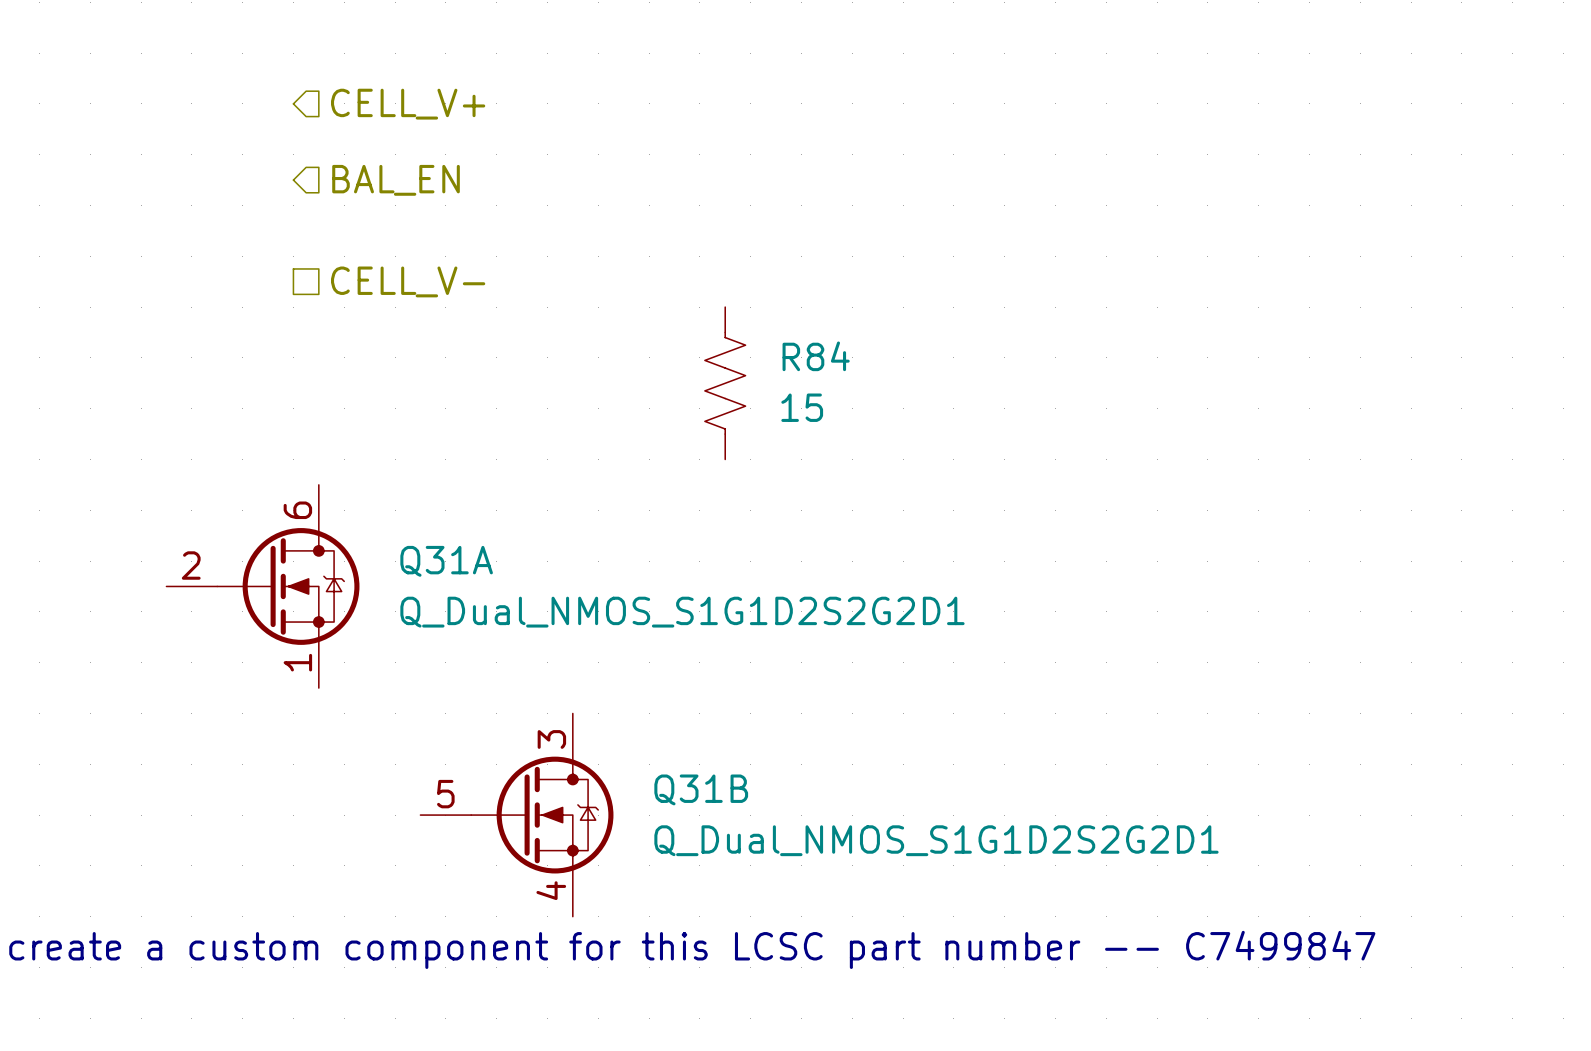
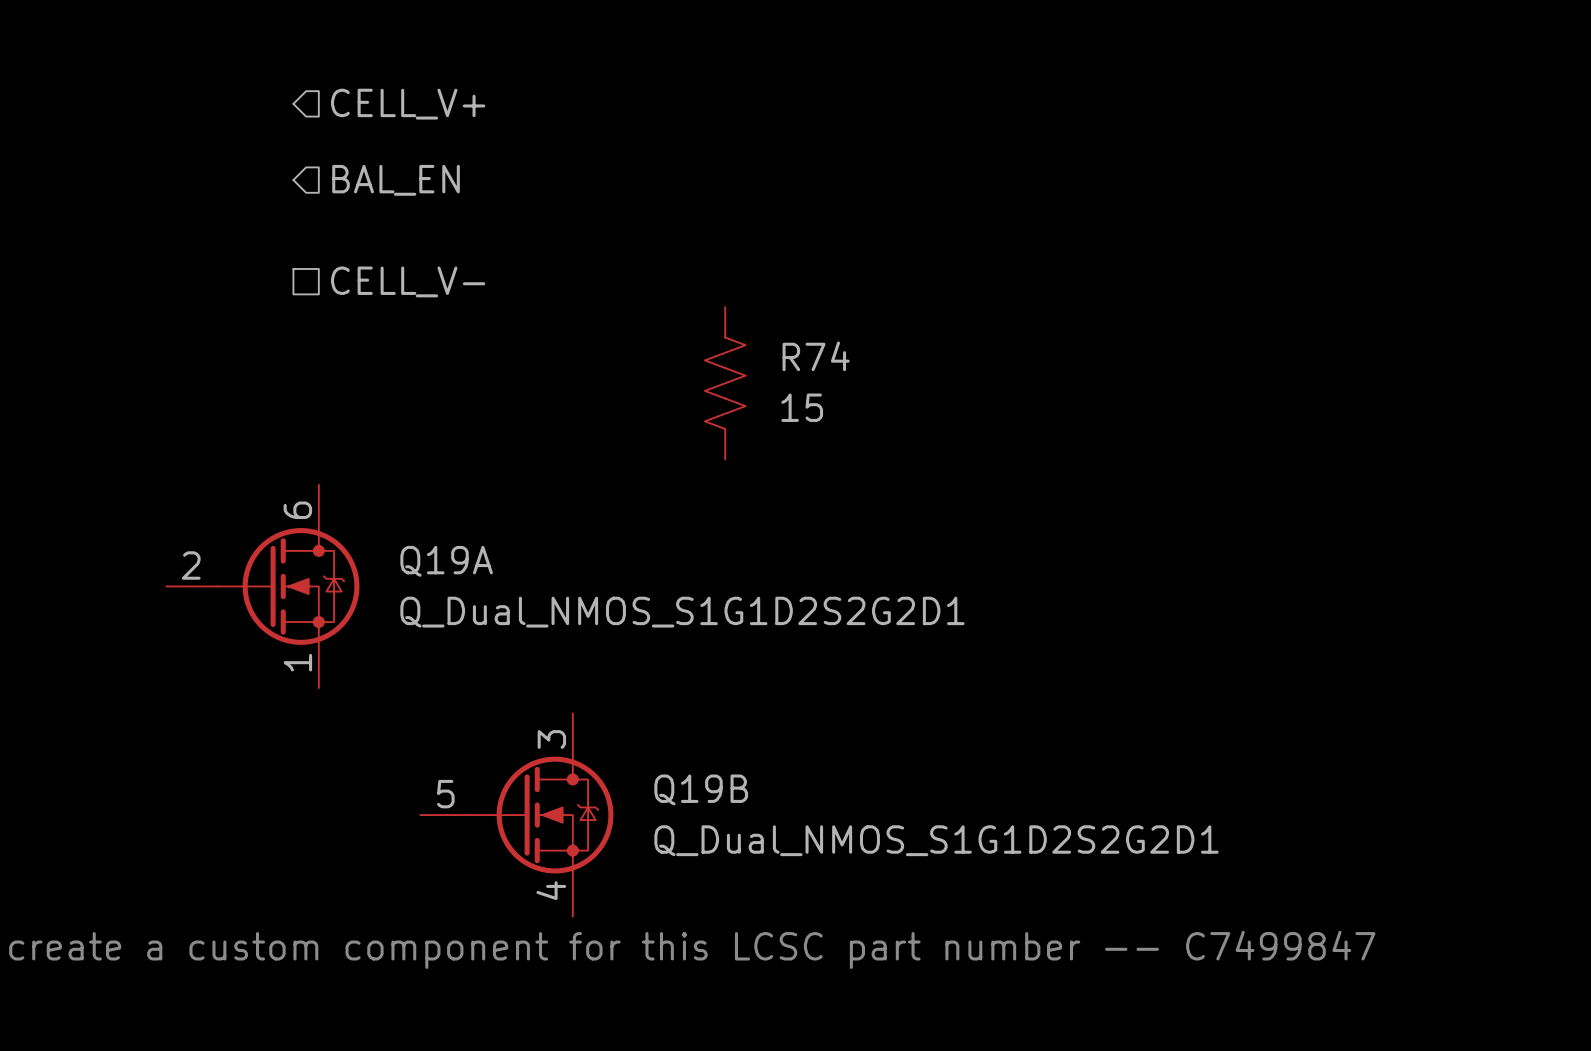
R84 name: R84 (816, 356) -> R74 (816, 356)
Q31A name: Q31A (446, 561) -> Q19A (446, 561)
Q31B name: Q31B (701, 789) -> Q19B (701, 789)

